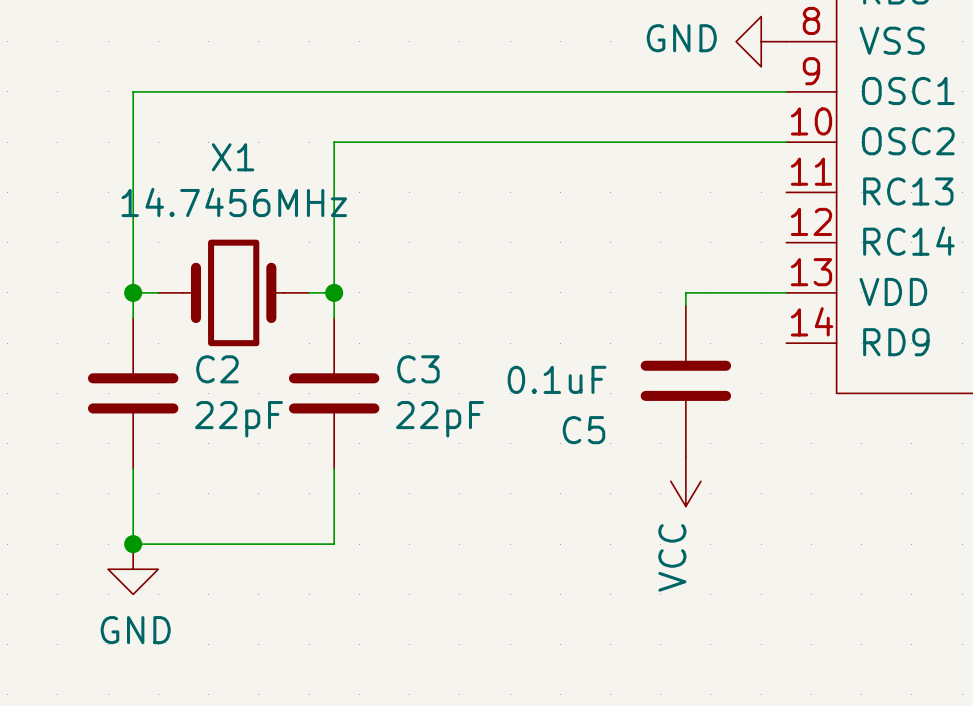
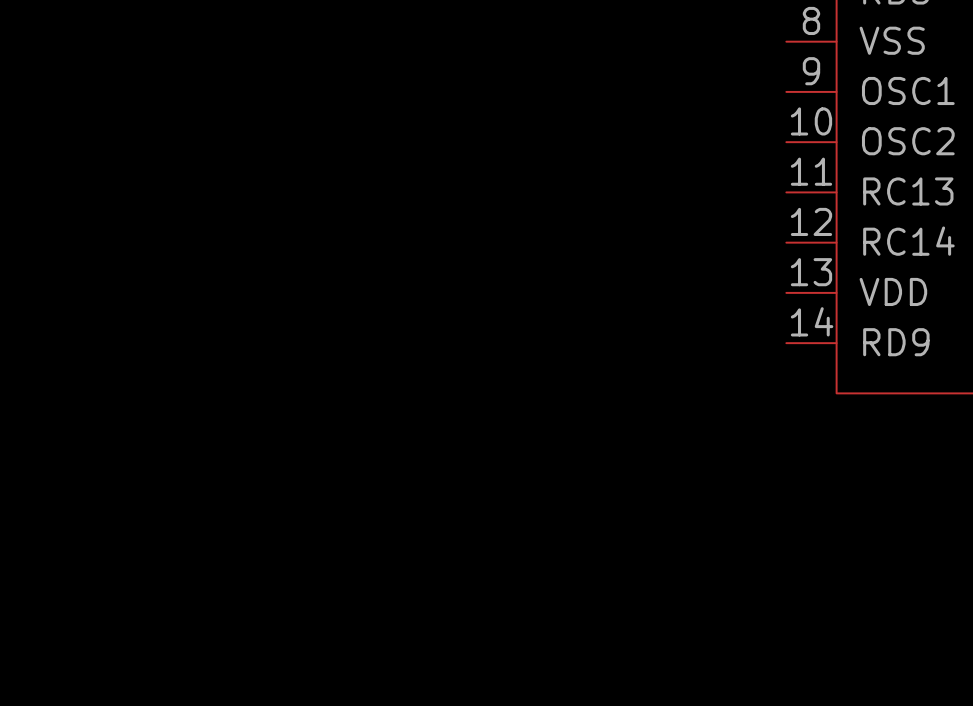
power symbol: GND (761, 41) -> none
wire: (786, 91) (133, 91) (133, 318) -> none
wire: (786, 142) (334, 142) (334, 318) -> none
wire: (133, 292) (158, 292) -> none
junction: (133, 292) -> none
X1: 14.7456MHz (233, 292) -> none
wire: (309, 292) (334, 292) -> none
junction: (334, 292) -> none
wire: (786, 292) (685, 292) (685, 305) -> none
C5: 0.1uF (685, 380) -> none
C2: 22pF (133, 393) -> none
C3: 22pF (334, 393) -> none
wire: (133, 468) (133, 544) (334, 544) (334, 468) -> none
power symbol: VCC (685, 481) -> none
junction: (133, 544) -> none
power symbol: GND (133, 569) -> none

